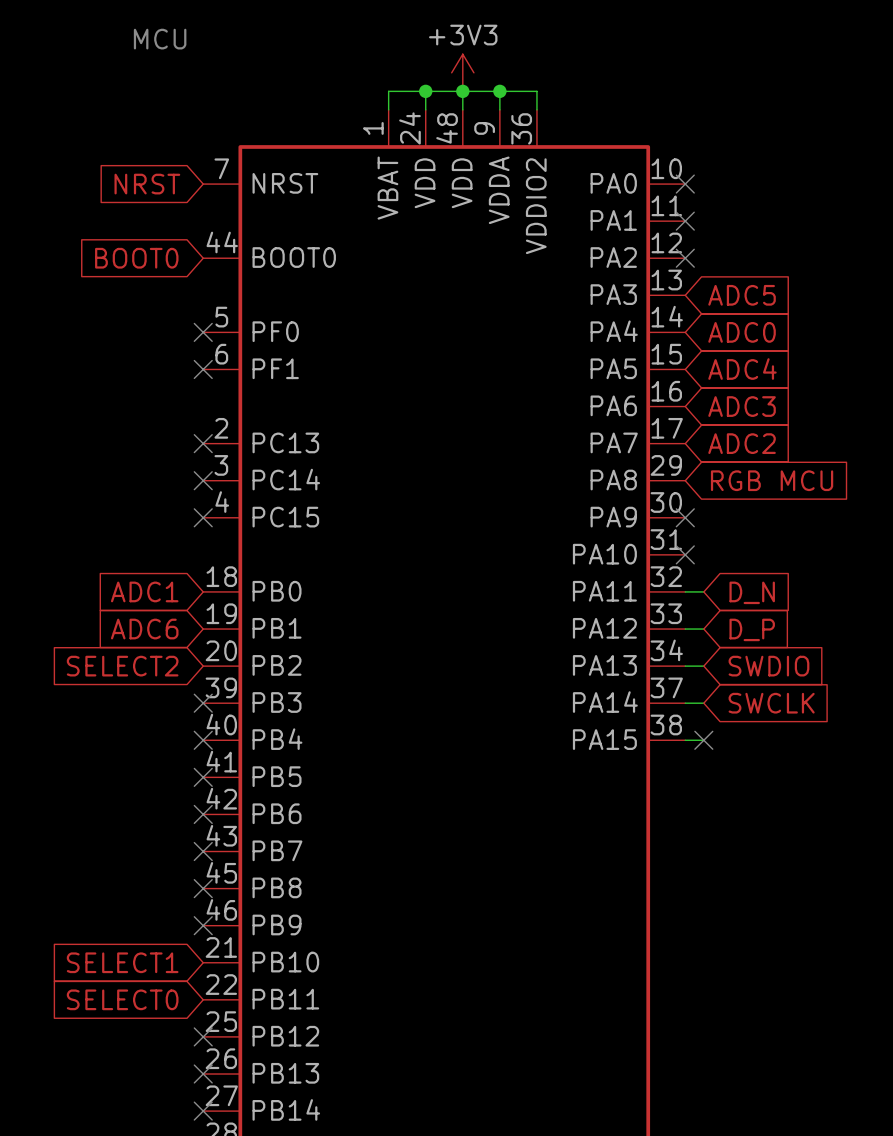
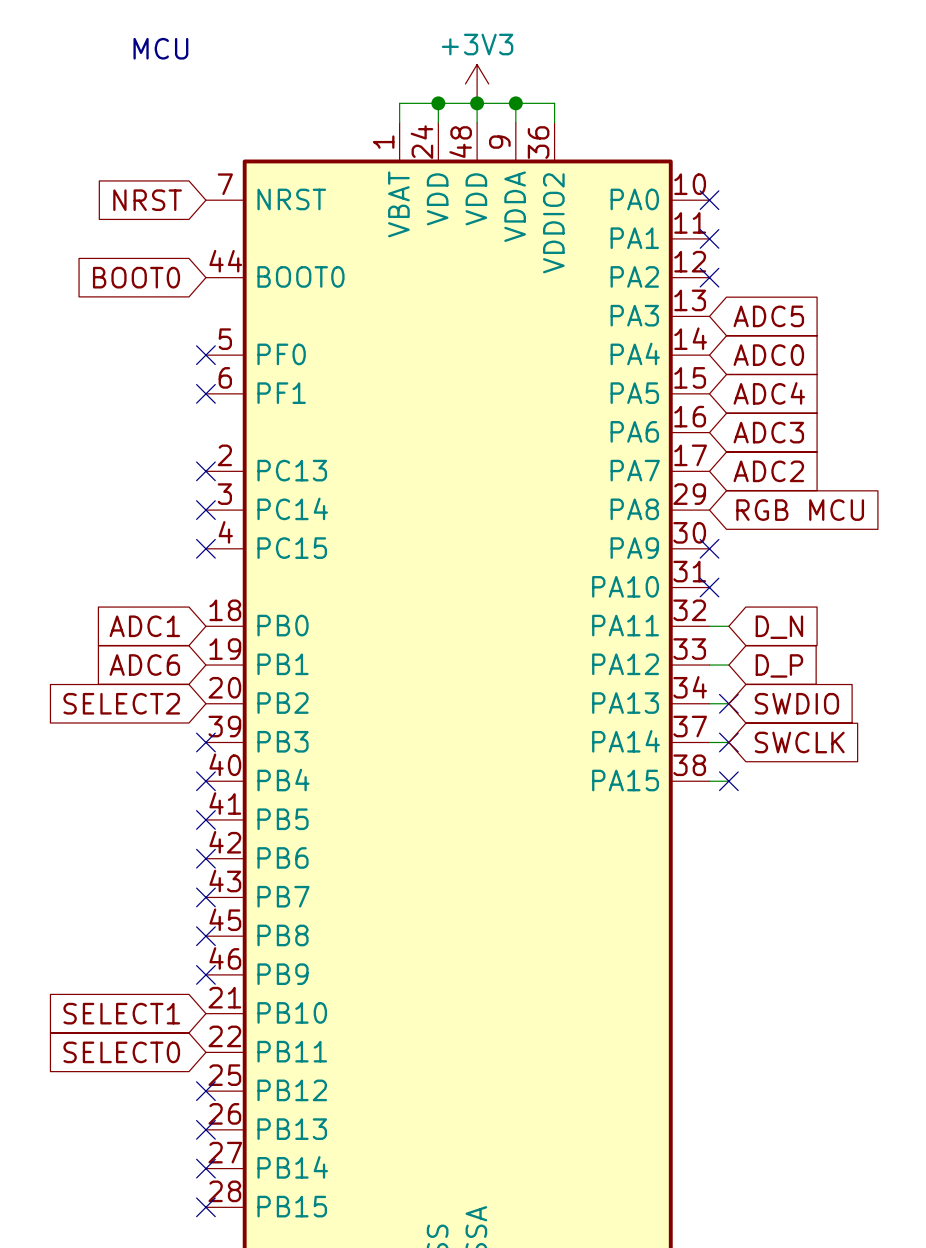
no-connect mark: none -> (728, 703)
no-connect mark: none -> (728, 742)

